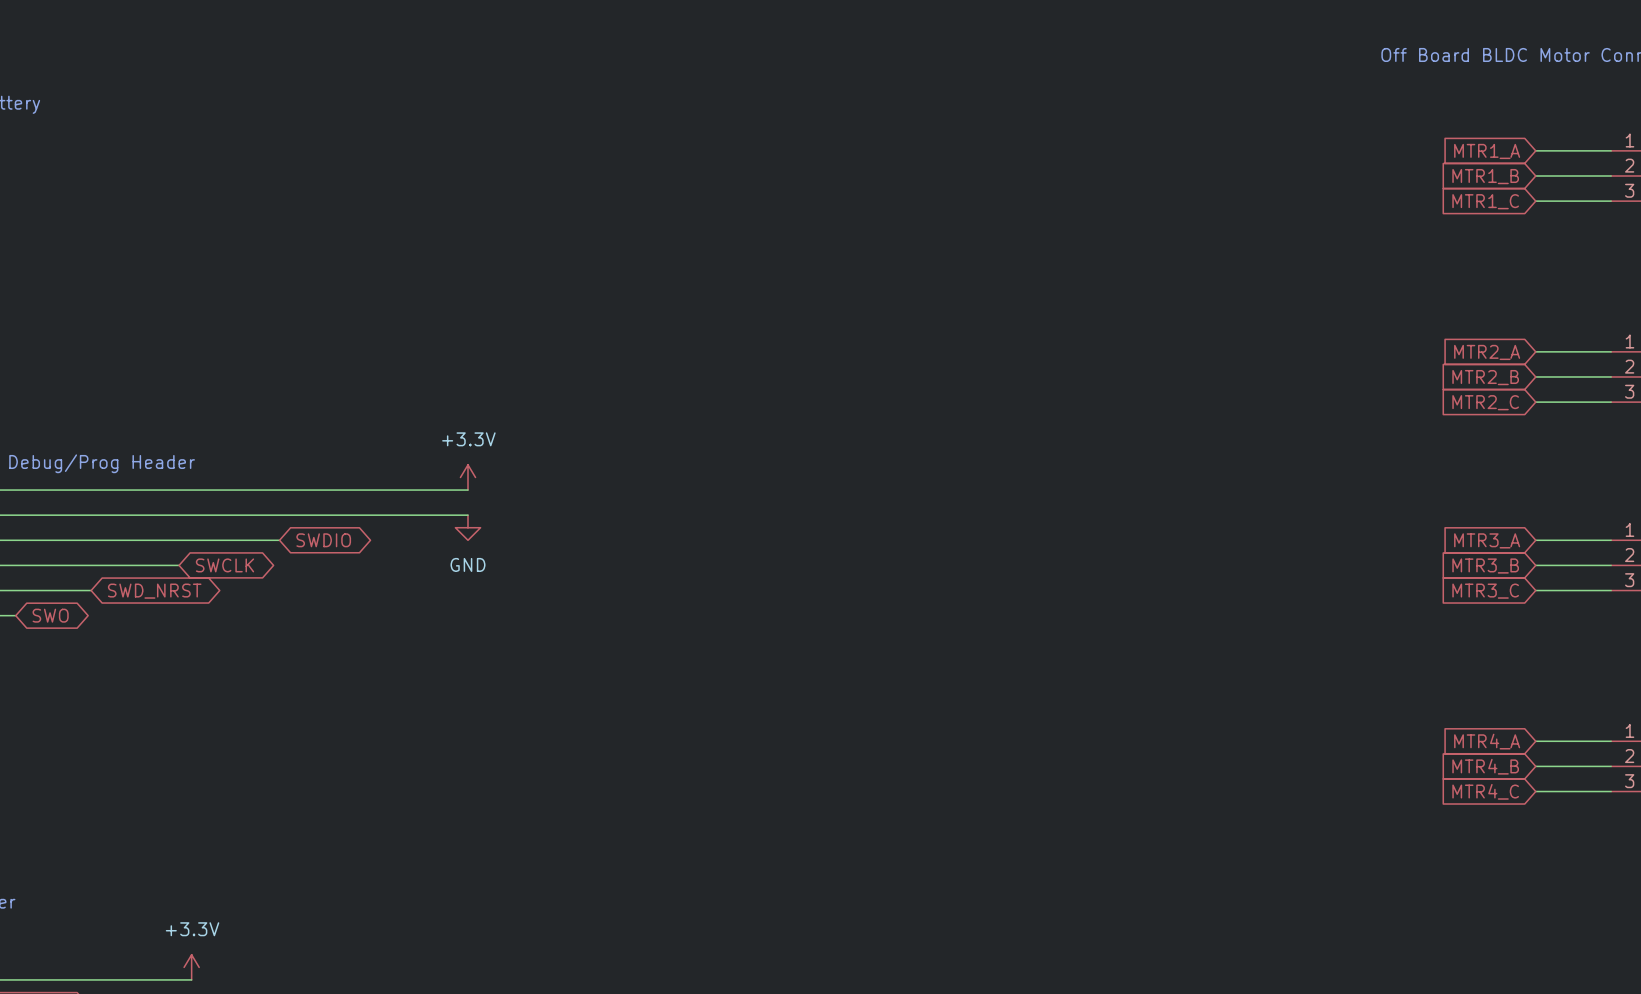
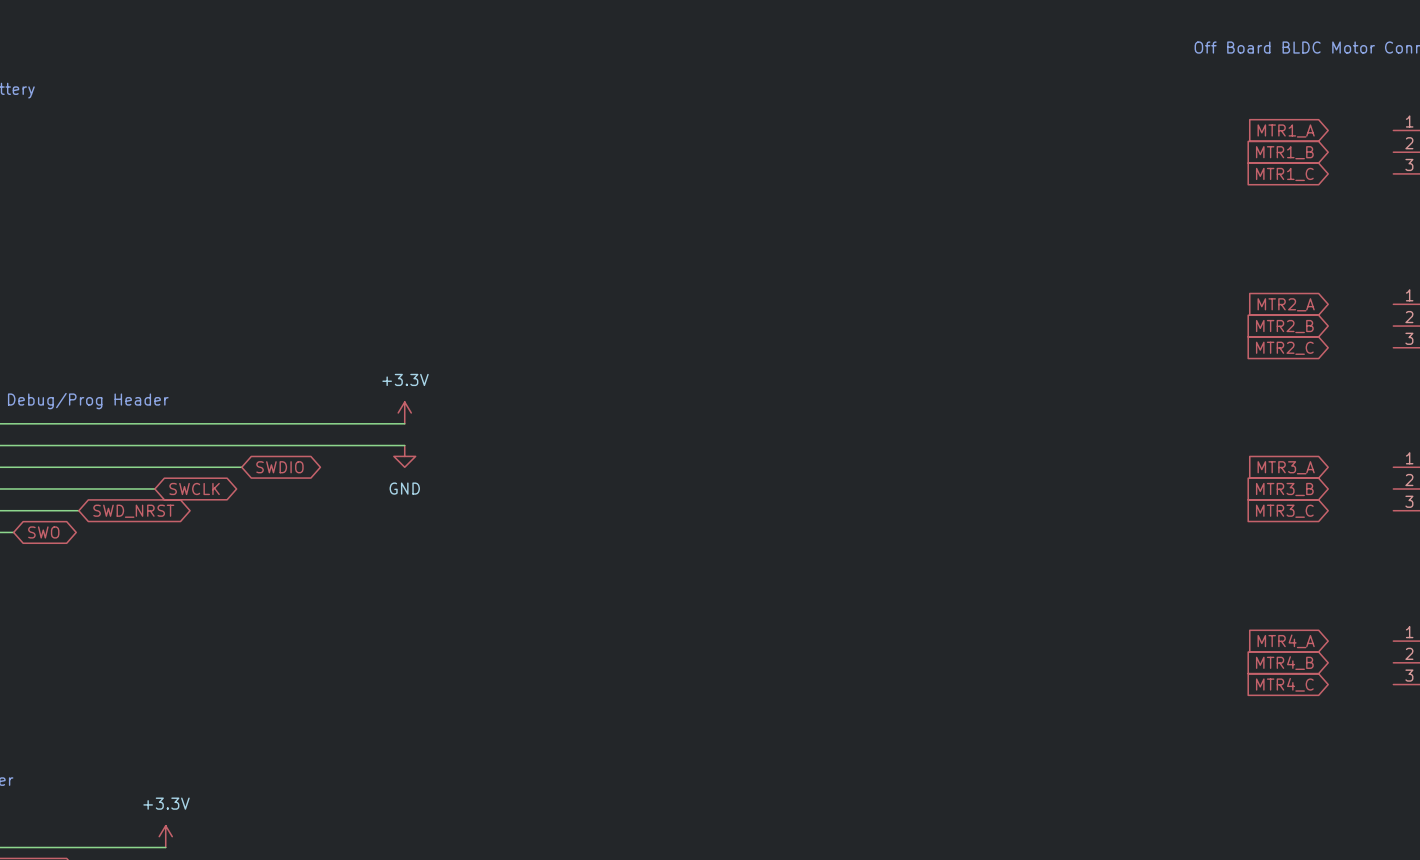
wire: (1535, 150) (1611, 150) -> none
wire: (1535, 175) (1611, 175) -> none
wire: (1535, 201) (1611, 201) -> none
wire: (1535, 351) (1611, 351) -> none
wire: (1535, 376) (1611, 376) -> none
wire: (1535, 402) (1611, 402) -> none
wire: (1535, 540) (1611, 540) -> none
wire: (1535, 565) (1611, 565) -> none
wire: (1535, 590) (1611, 590) -> none
wire: (1535, 741) (1611, 741) -> none
wire: (1535, 766) (1611, 766) -> none
wire: (1535, 791) (1611, 791) -> none

